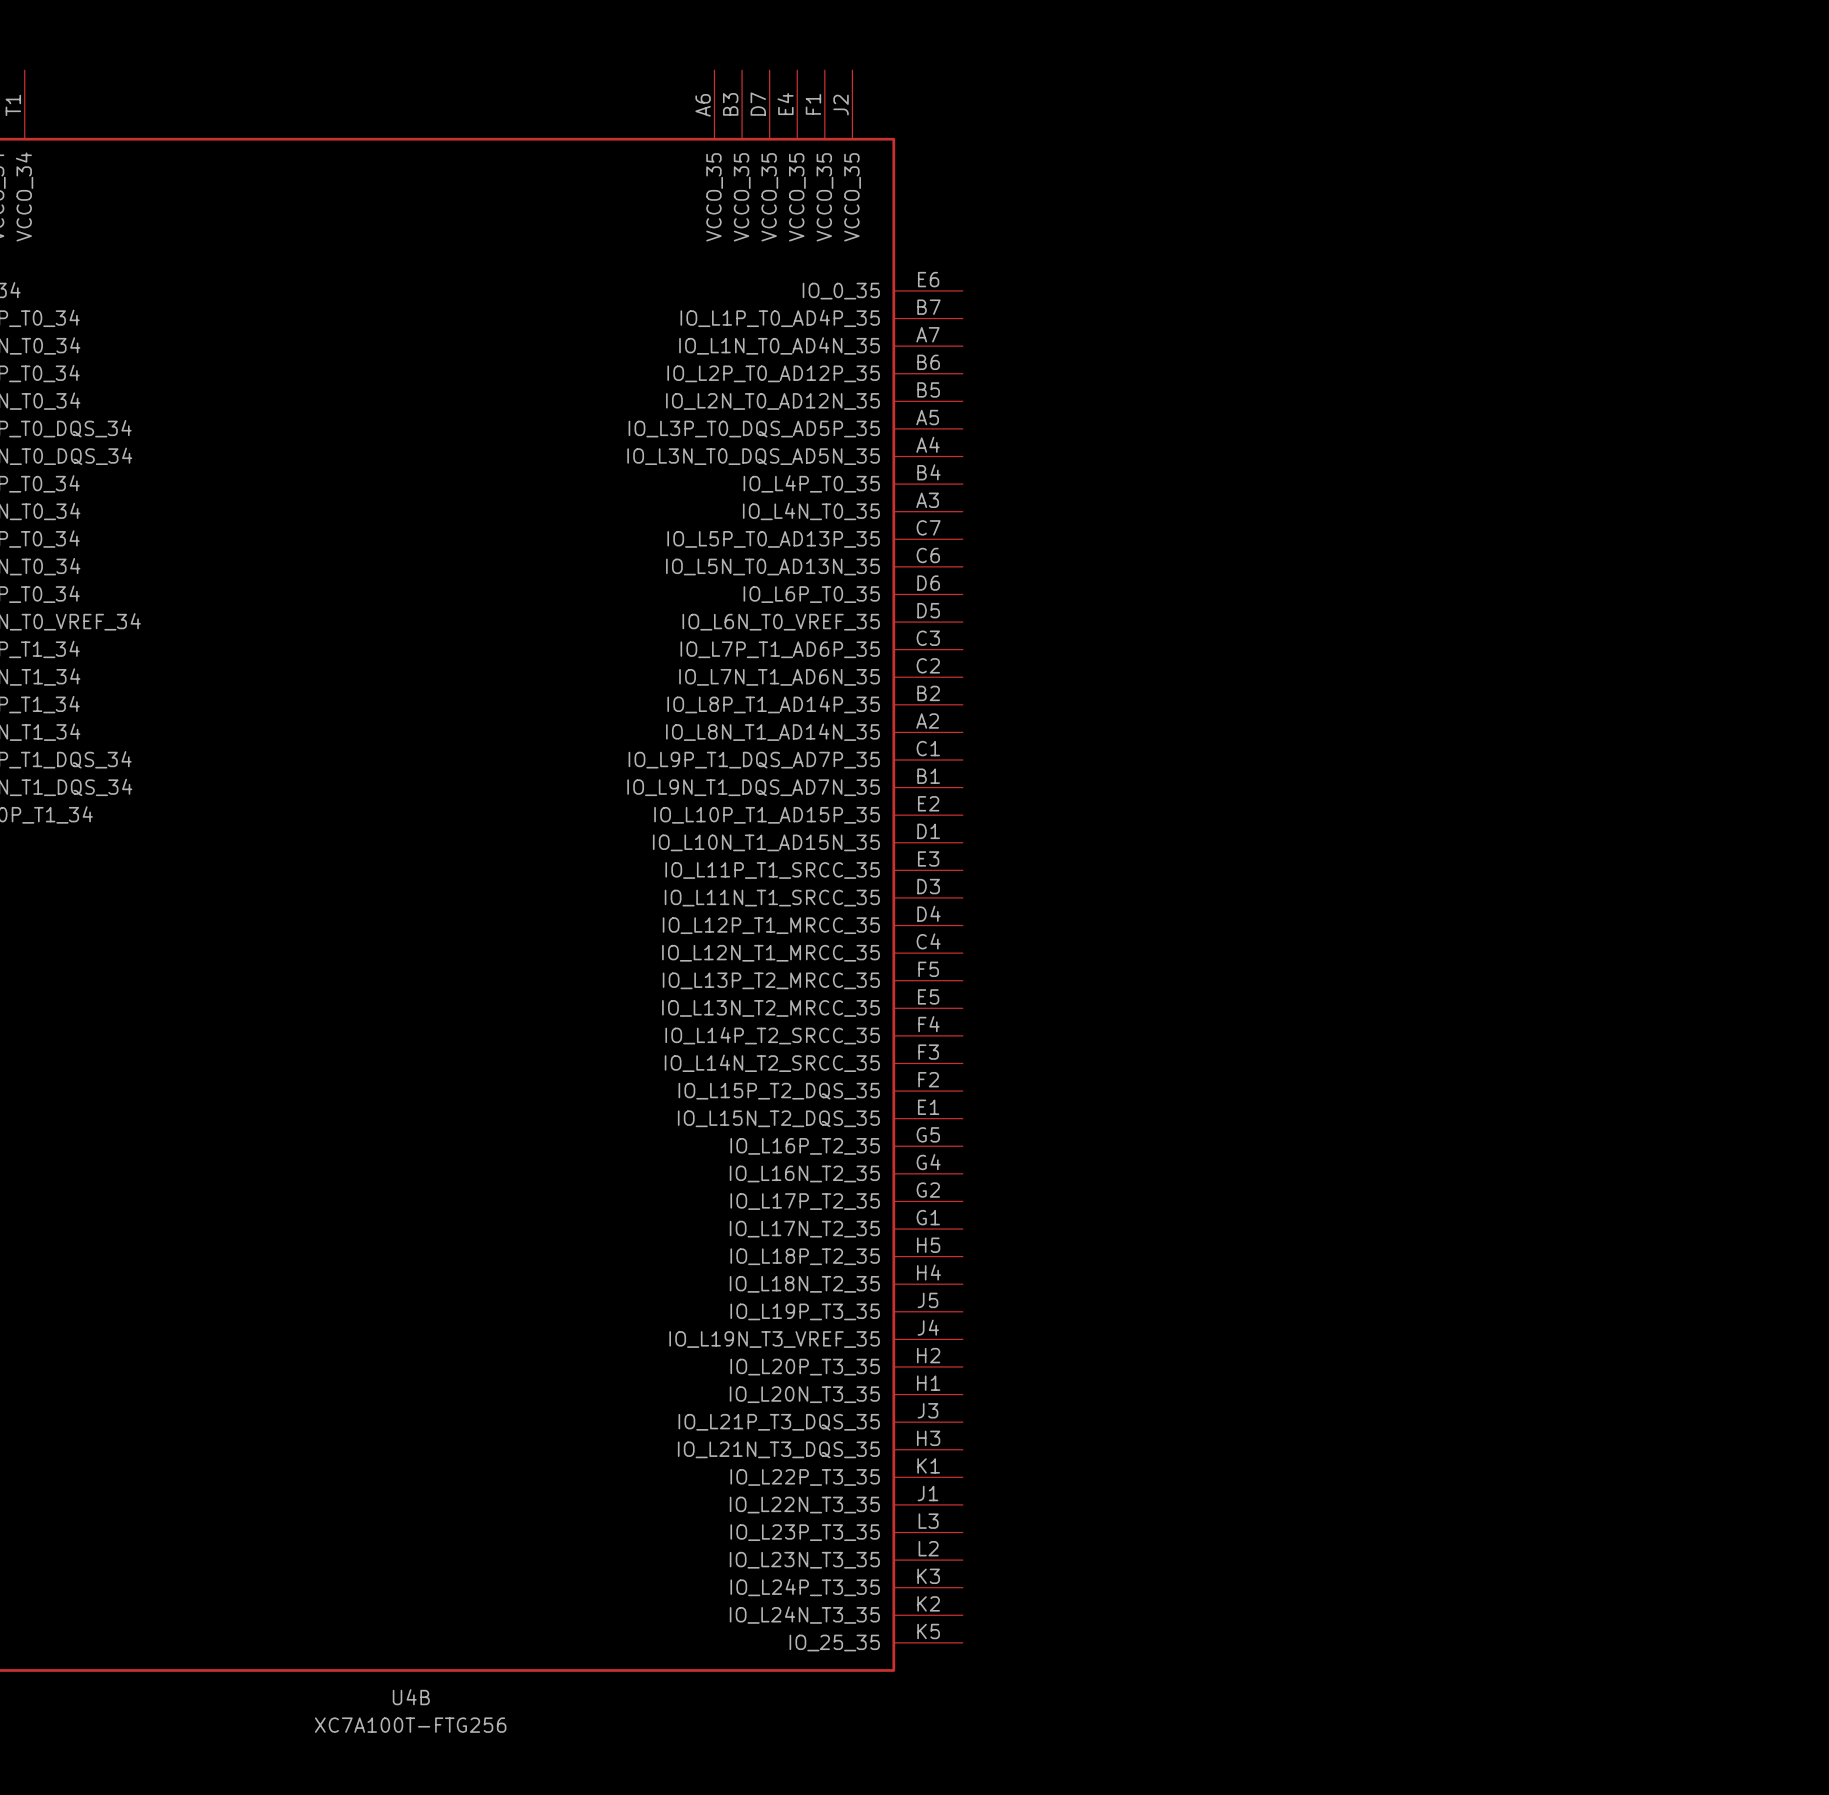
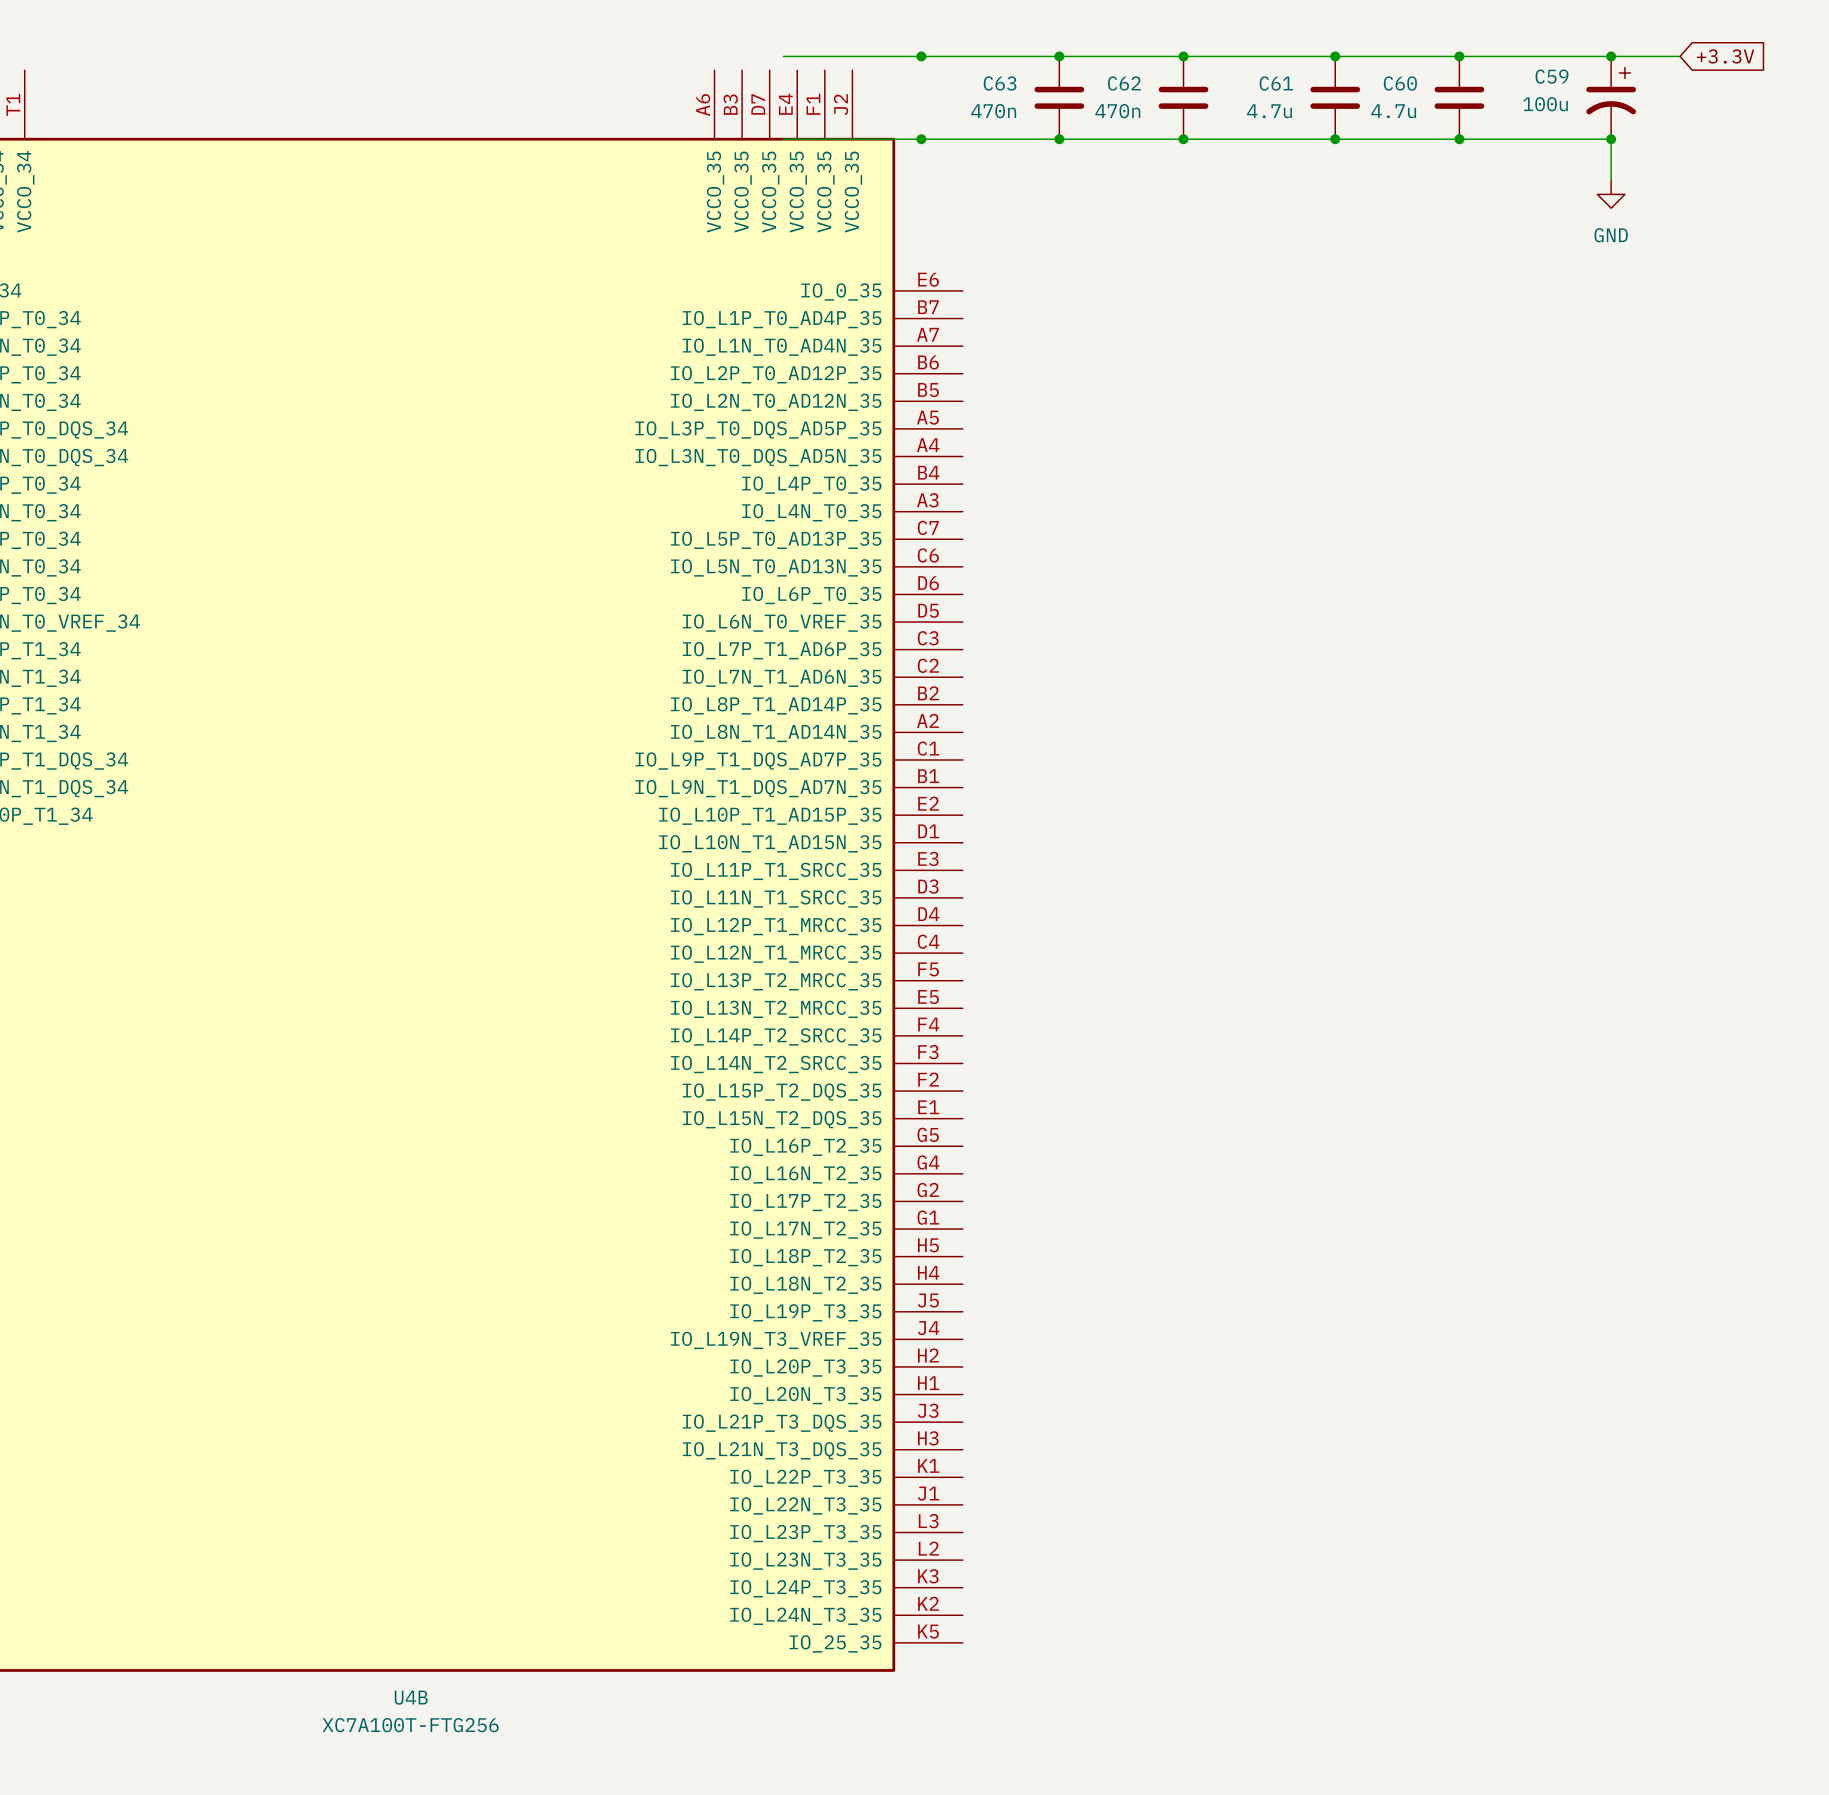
wire: none -> (783, 56) (1680, 56)
junction: none -> (921, 56)
junction: none -> (1059, 56)
junction: none -> (1183, 56)
junction: none -> (1335, 56)
junction: none -> (1459, 56)
junction: none -> (1611, 56)
global label: none -> +3.3V (1725, 56)
C63: none -> 470n (1059, 97)
C62: none -> 470n (1183, 97)
C61: none -> 4.7u (1335, 97)
C60: none -> 4.7u (1459, 97)
C59: none -> 100u (1611, 97)
wire: none -> (783, 139) (1611, 139) (1611, 180)
junction: none -> (921, 139)
junction: none -> (1059, 139)
junction: none -> (1183, 139)
junction: none -> (1335, 139)
junction: none -> (1459, 139)
junction: none -> (1611, 139)
power symbol: none -> GND (1611, 194)

